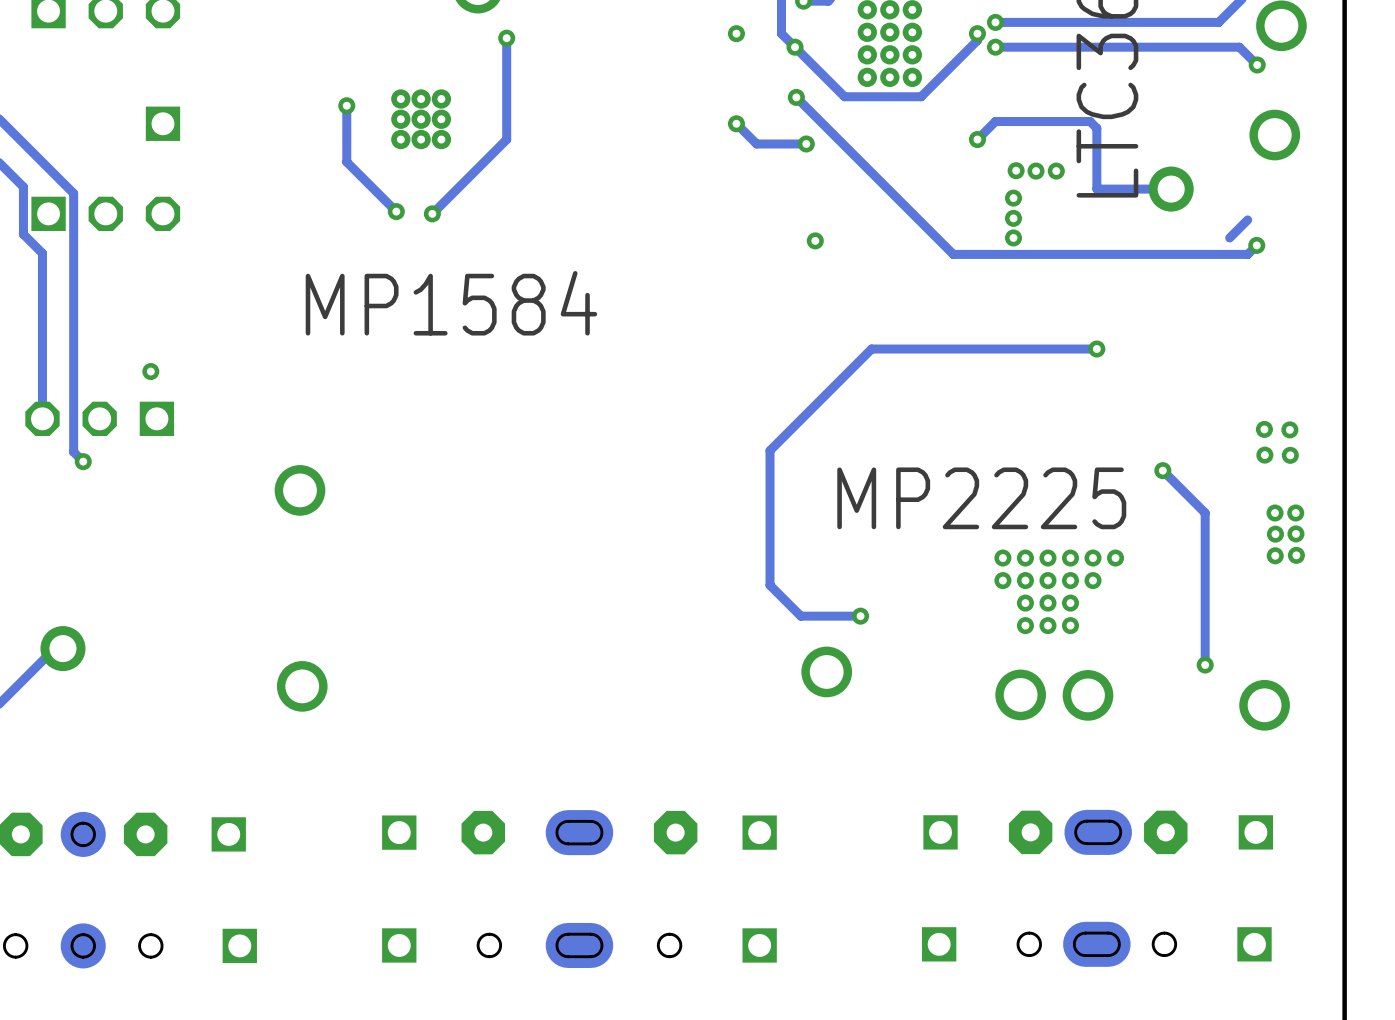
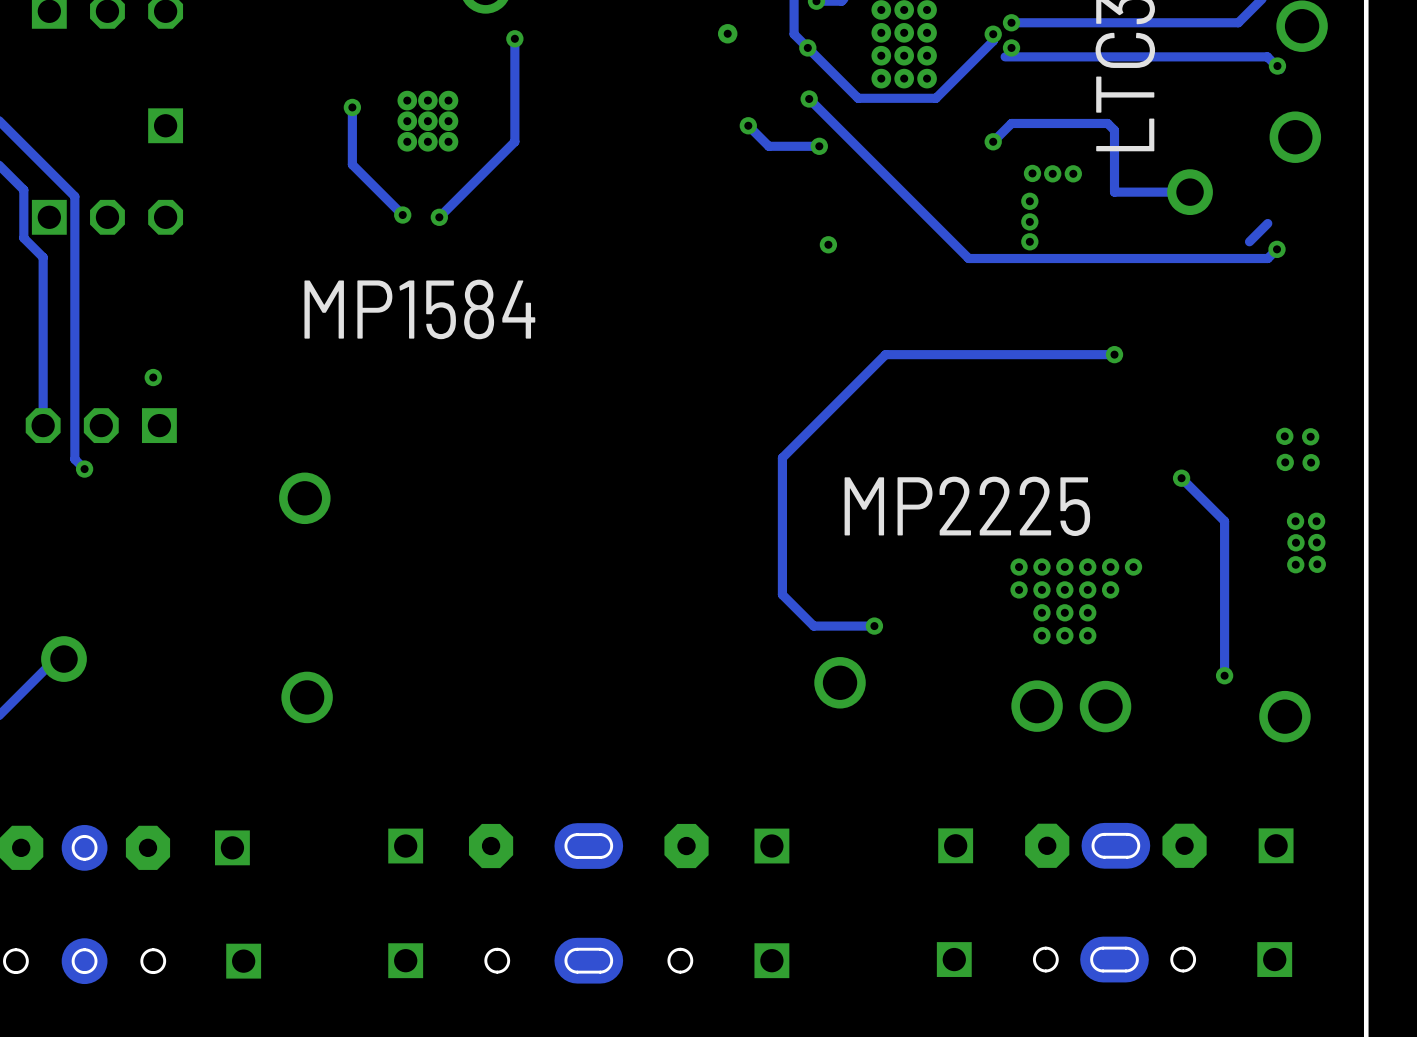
via: none -> (727, 33)
via: (736, 33) -> none
track: (995, 47) (1239, 47) (1257, 64) -> none
track: none -> (1005, 56) (1267, 56) (1279, 69)

